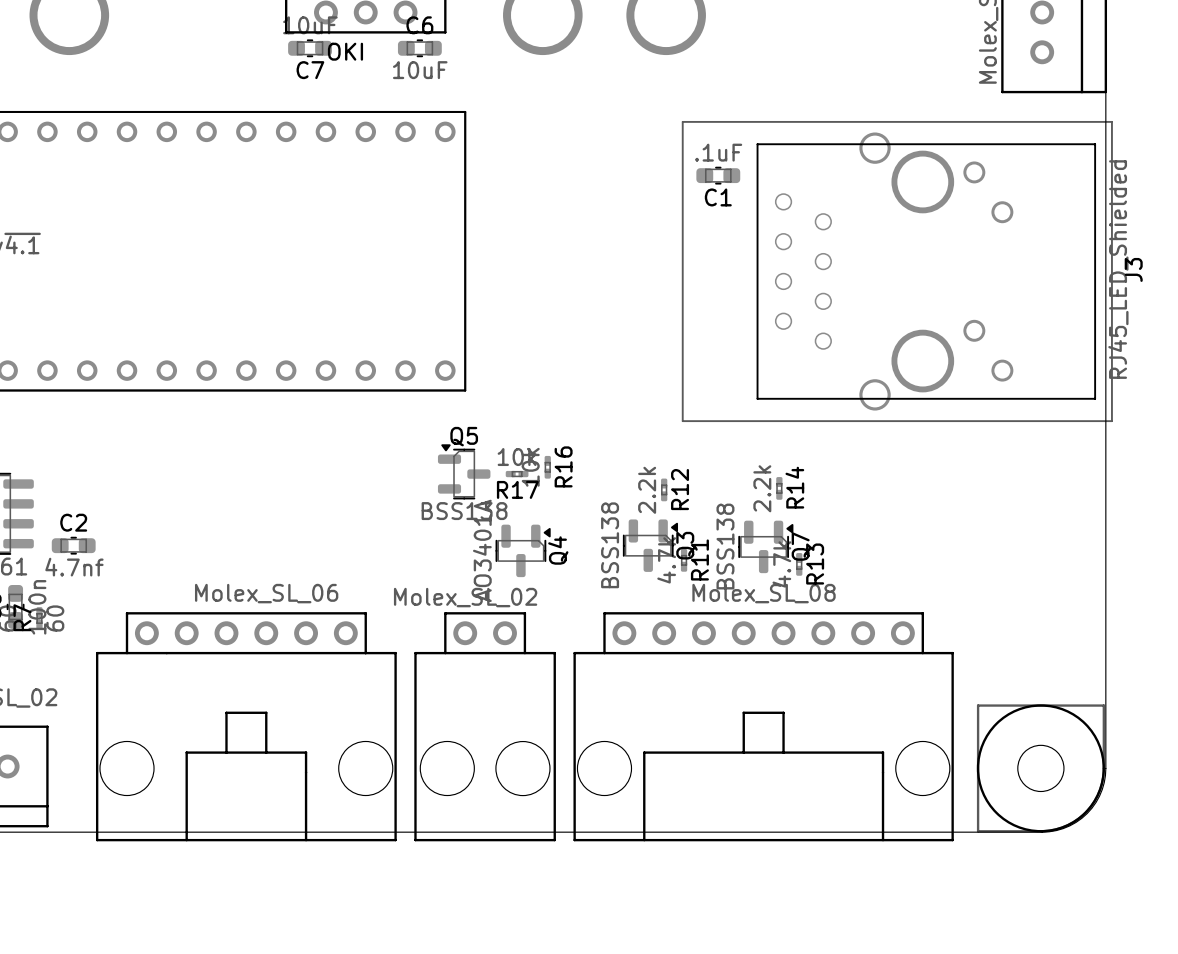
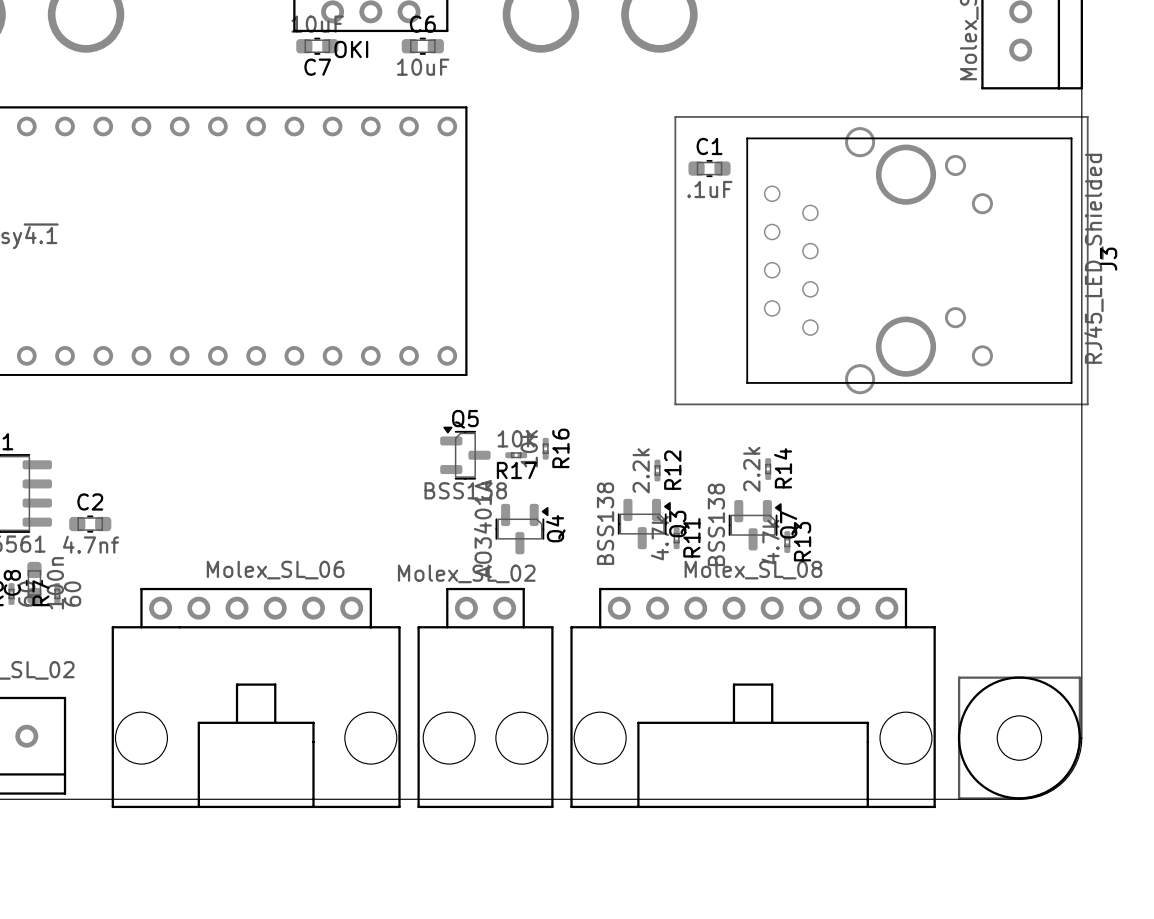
C1 value position: .1uF (718, 152) -> .1uF (709, 189)
C1 name position: C1 (718, 197) -> C1 (709, 146)

